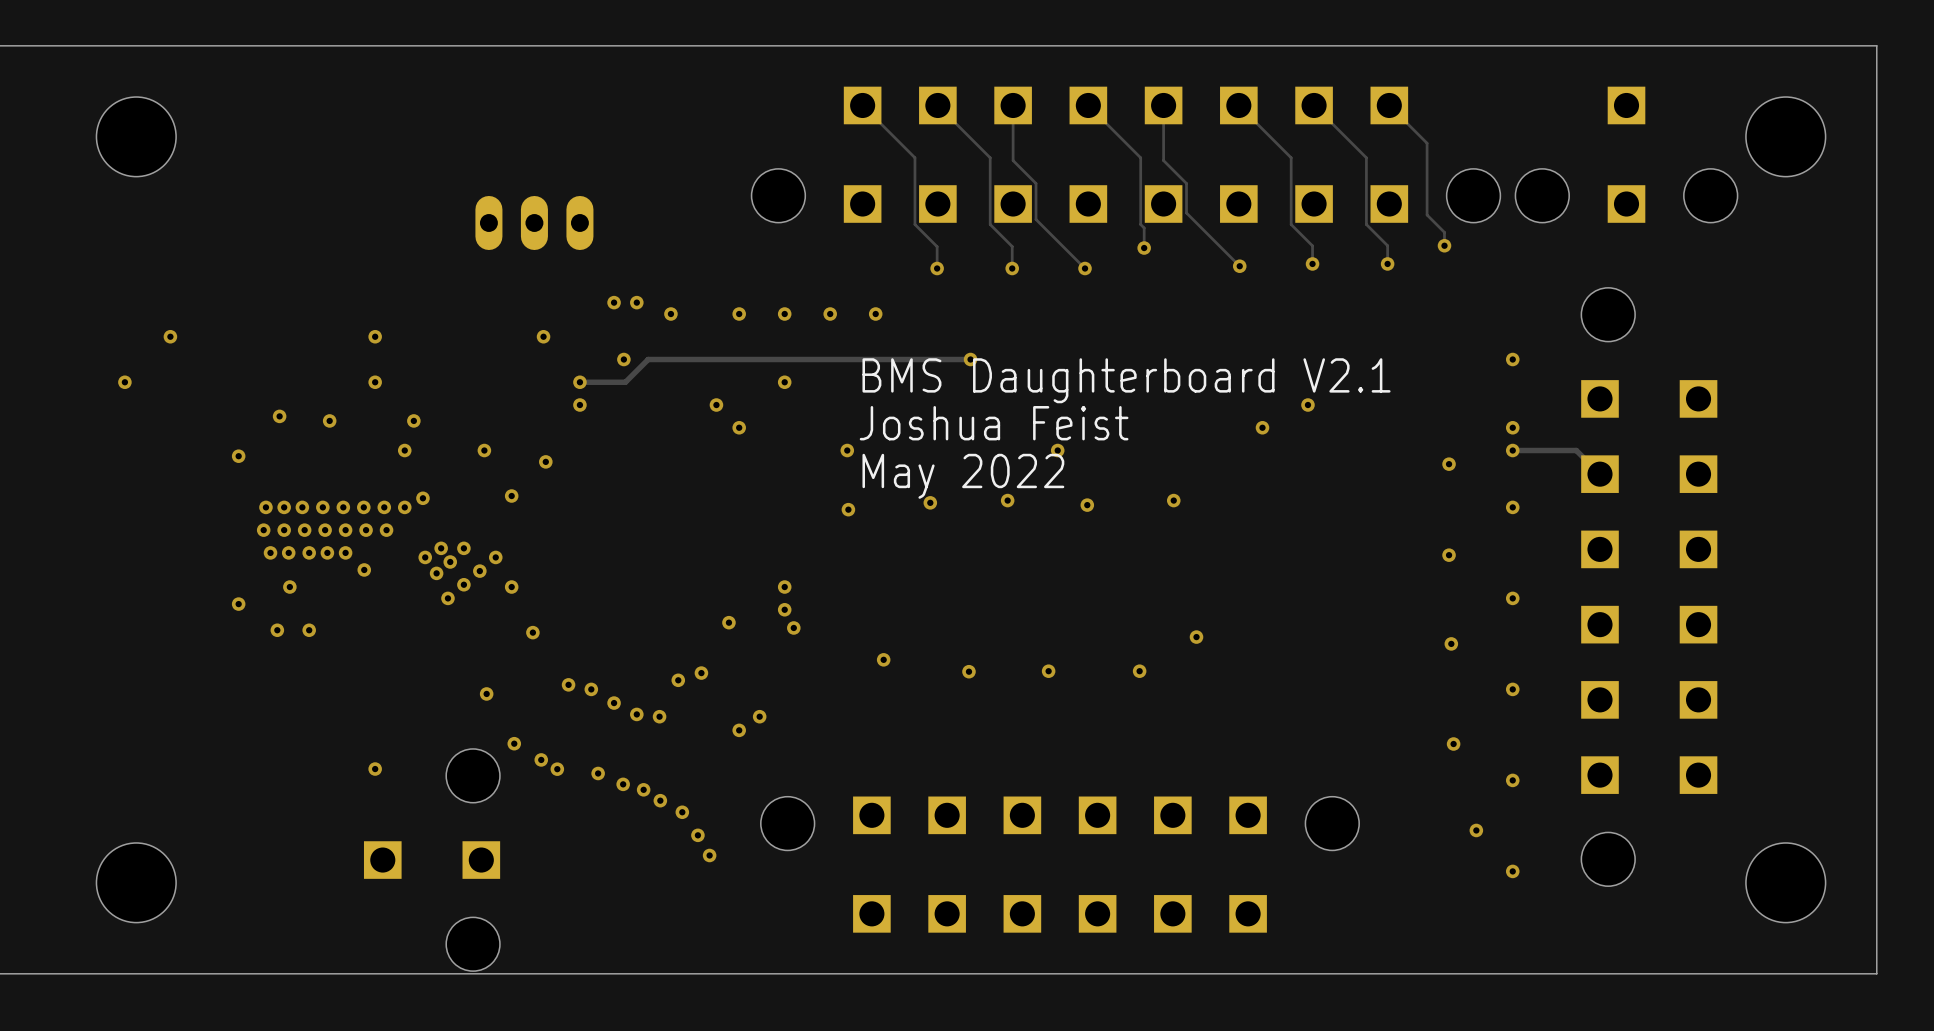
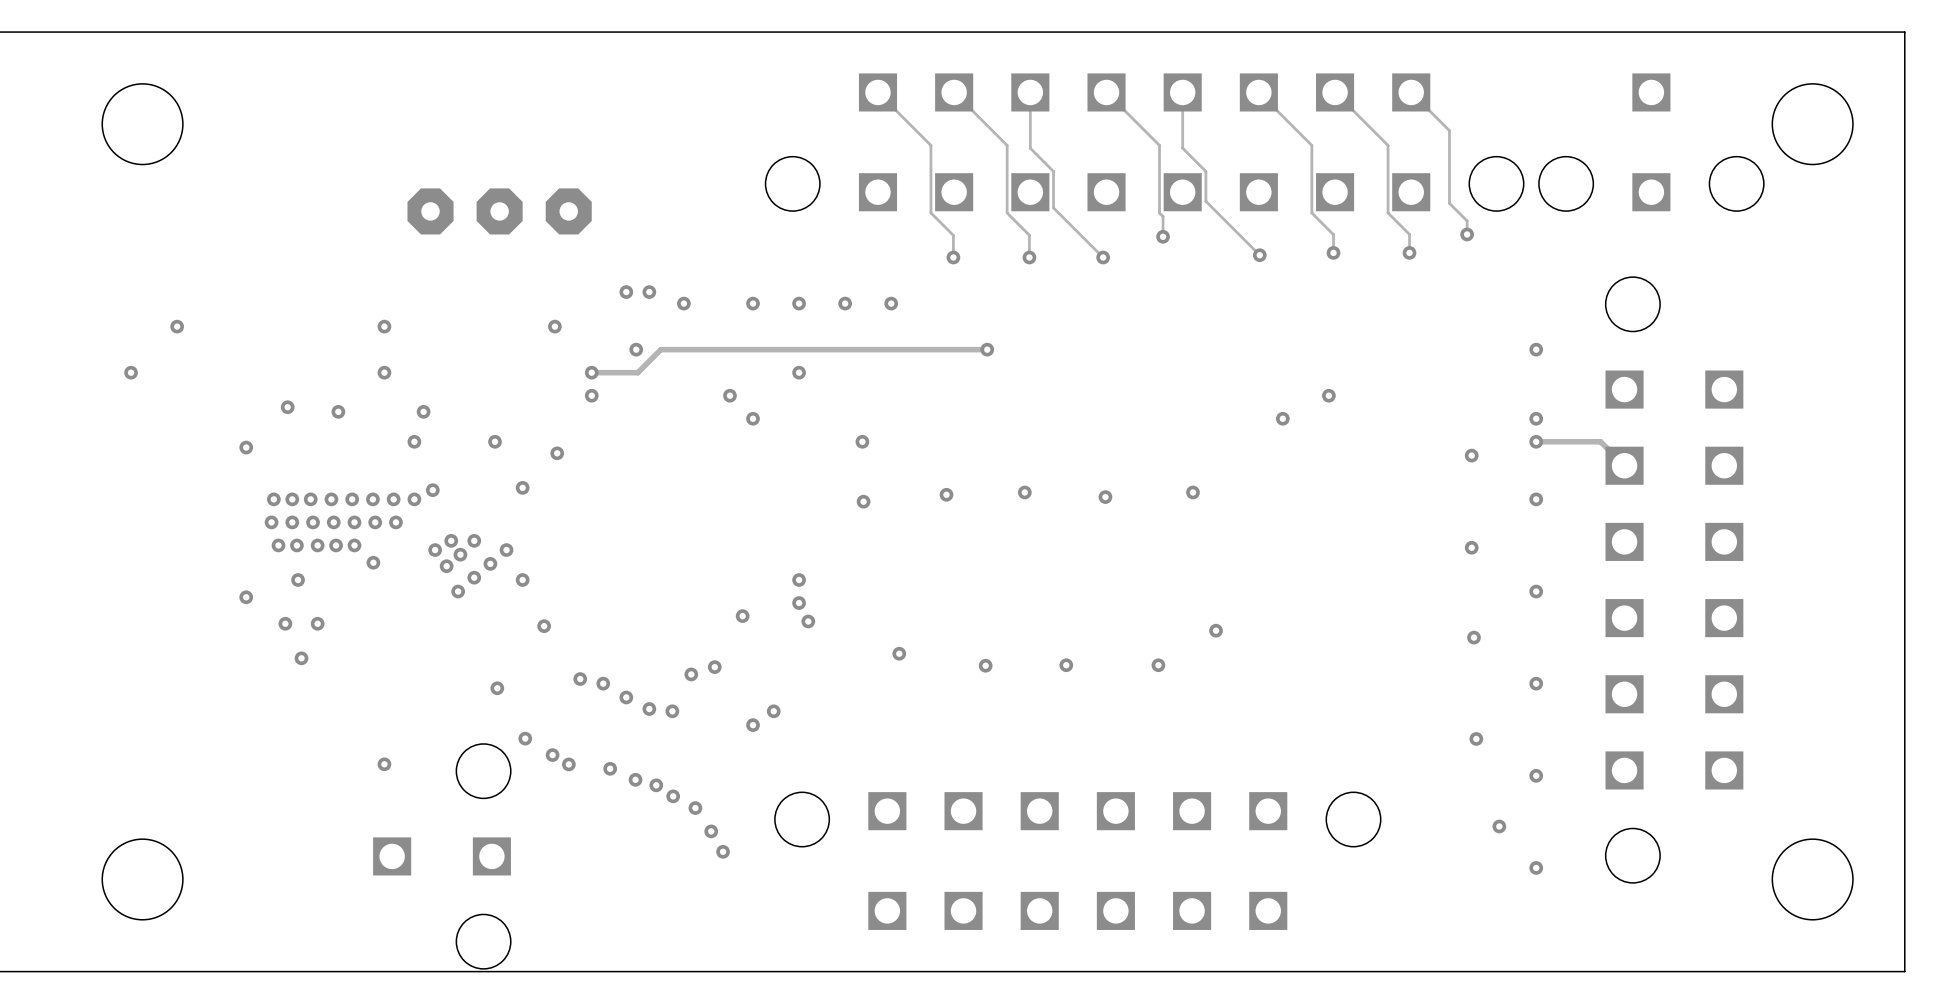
part: none -> (430, 211)
part: none -> (499, 211)
part: (534, 223) -> none
part: none -> (568, 211)
text: BMS Daughterboard V2.1 (1126, 380) -> none
text: Joshua Feist (994, 423) -> none
via: (1057, 450) -> none
text: May 2022 (963, 476) -> none
via: none -> (301, 658)

